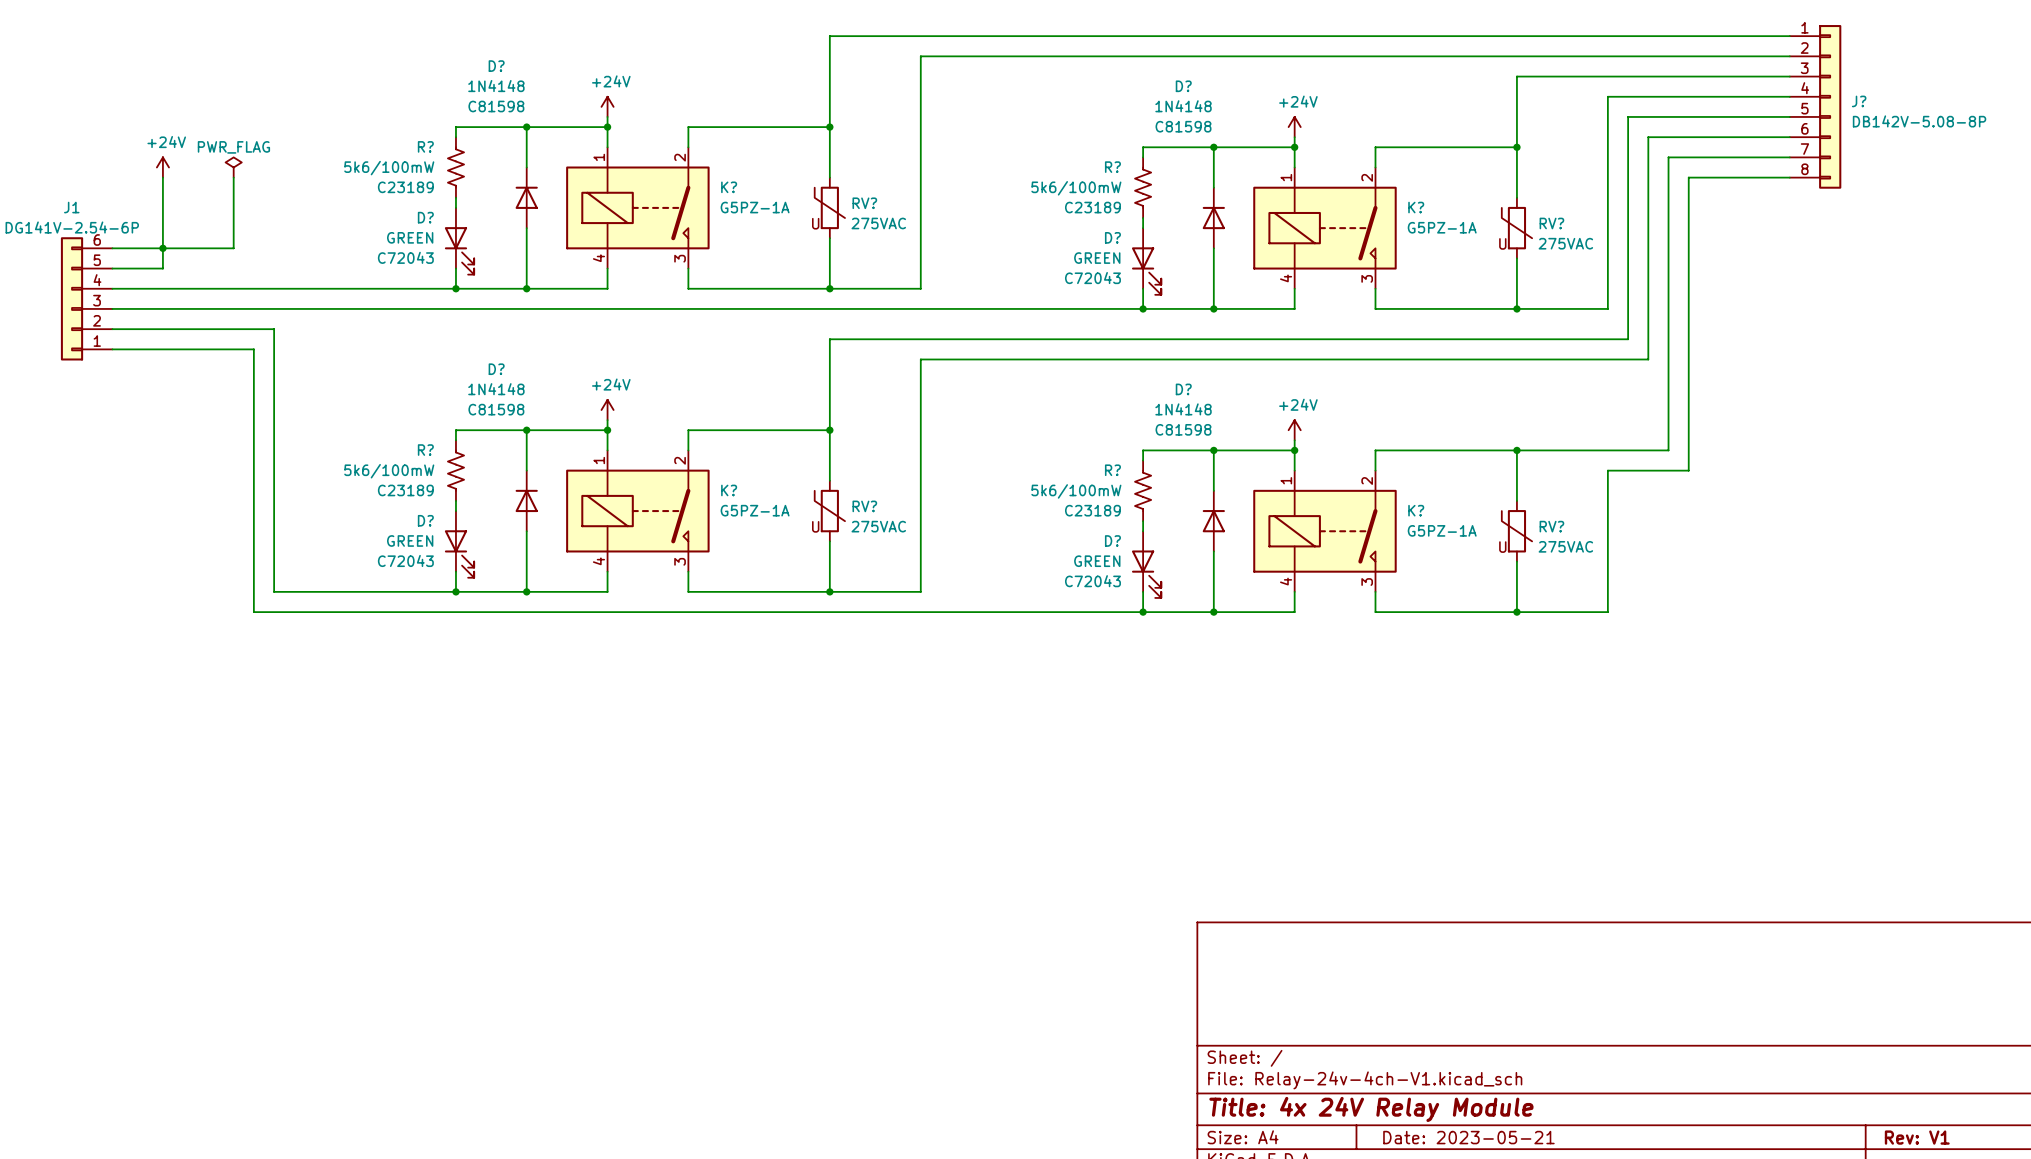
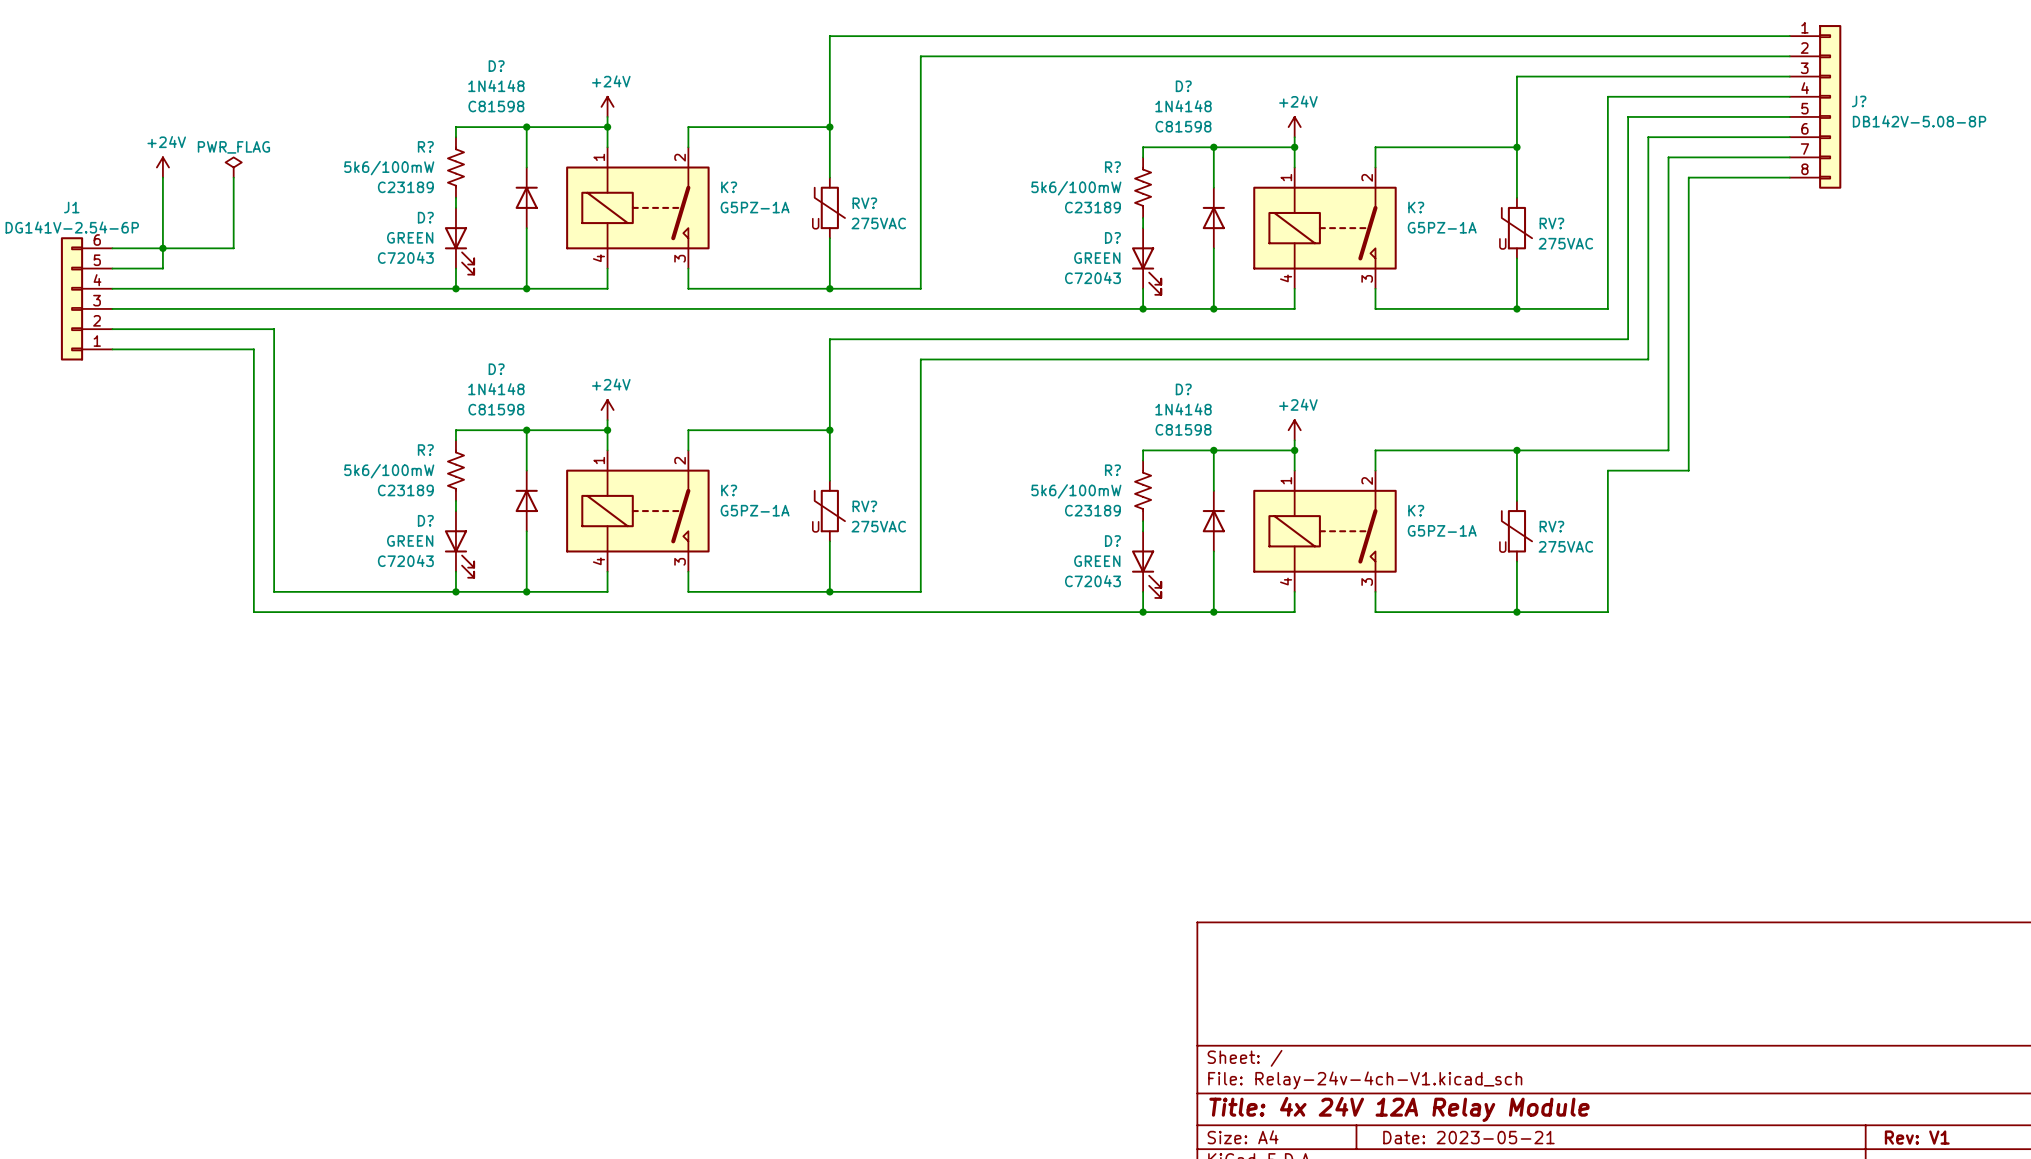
title block: Title: 4x 24V Relay Module (1371, 1109) -> Title: 4x 24V 12A Relay Module (1399, 1109)

